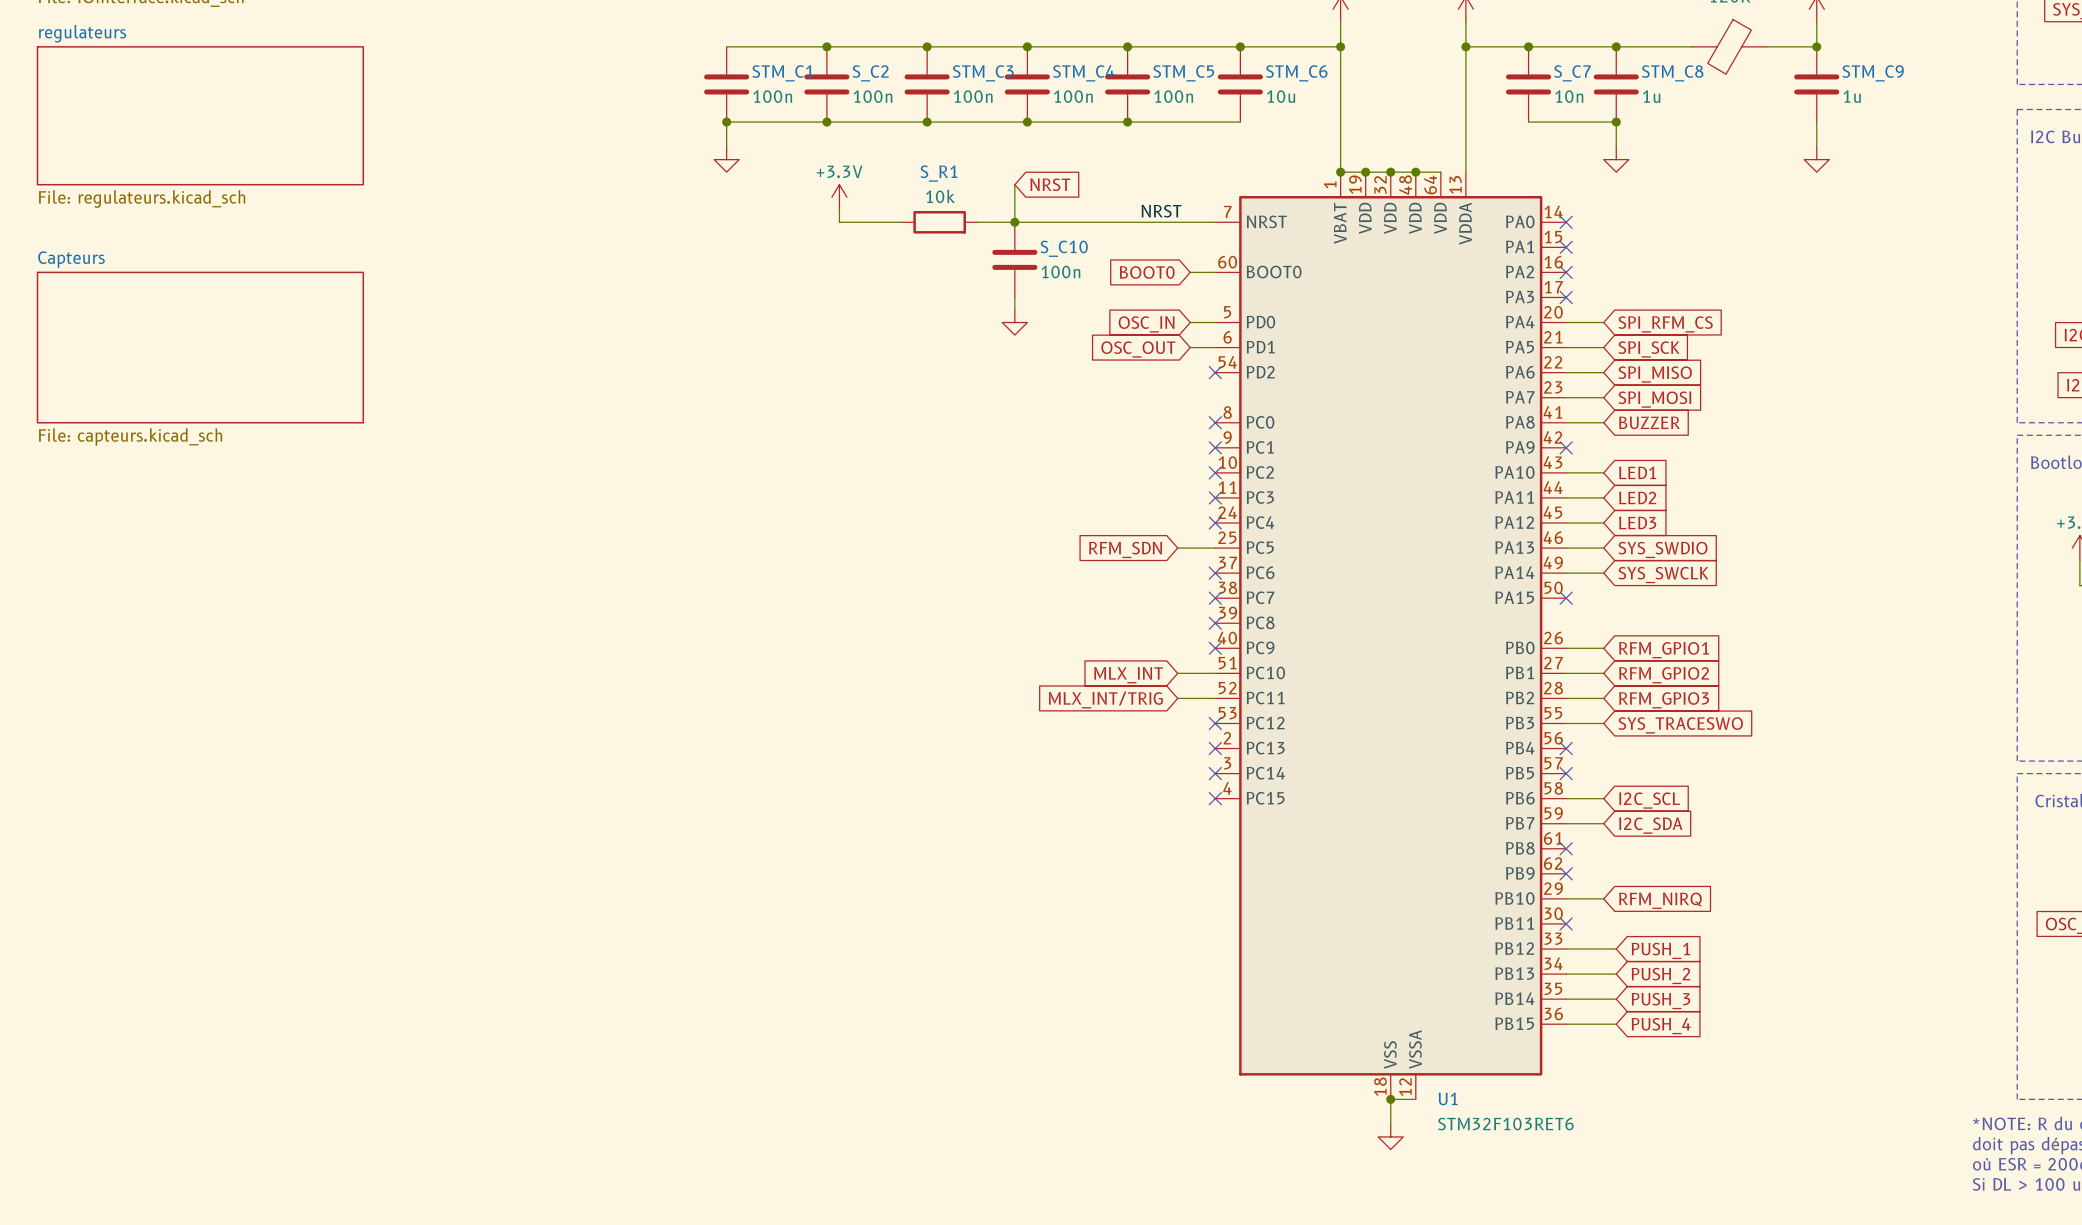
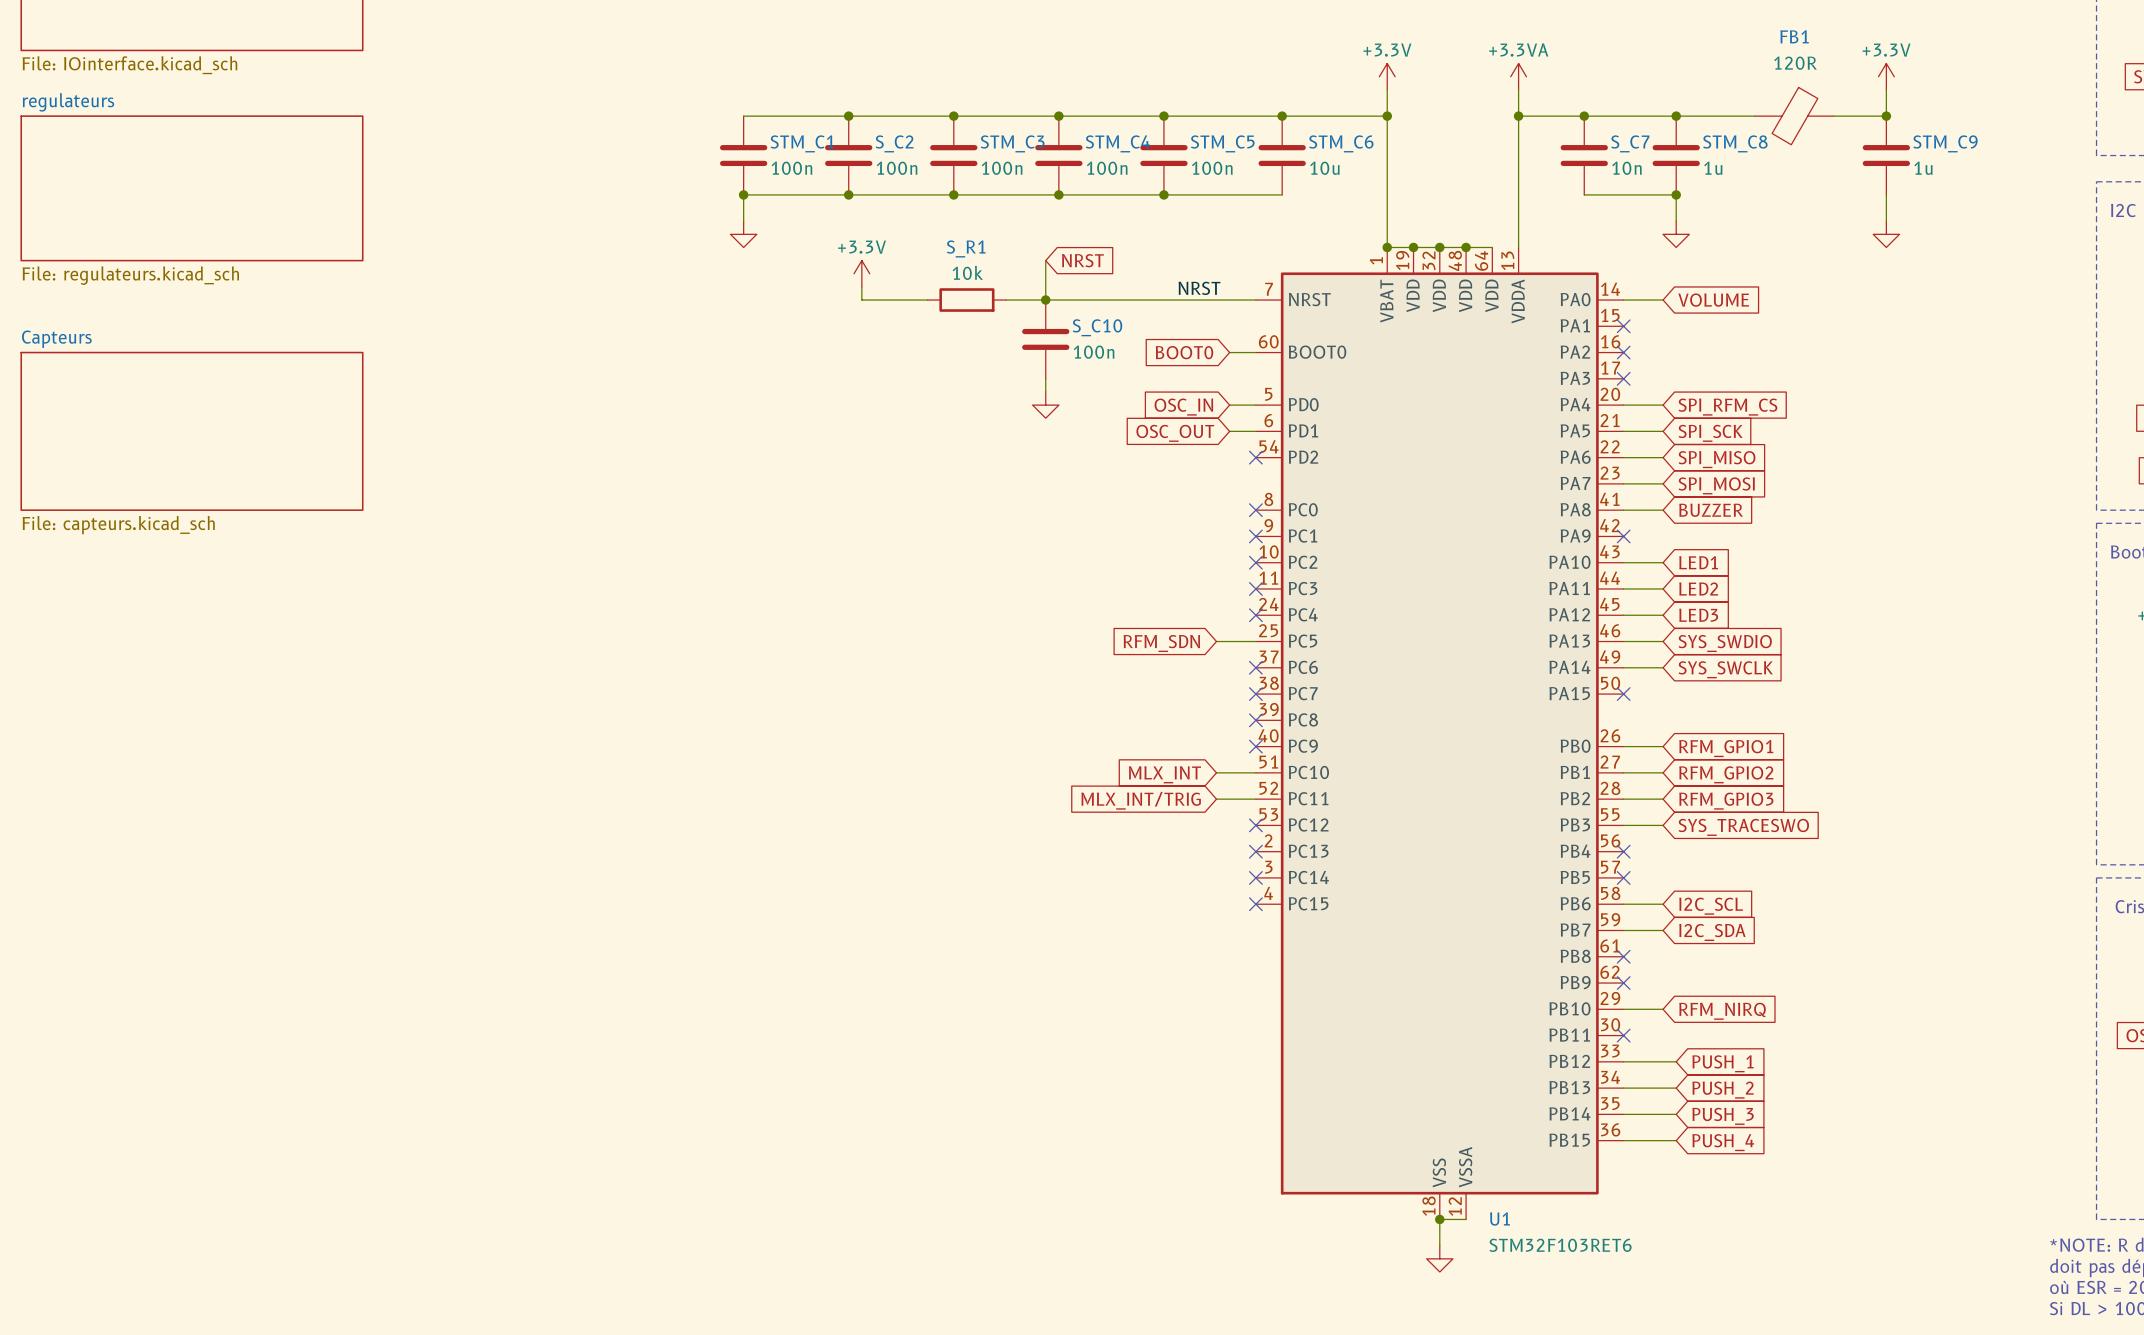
wire: none -> (1623, 300) (1663, 300)
no-connect mark: (1566, 222) -> none
global label: none -> VOLUME (1713, 300)

